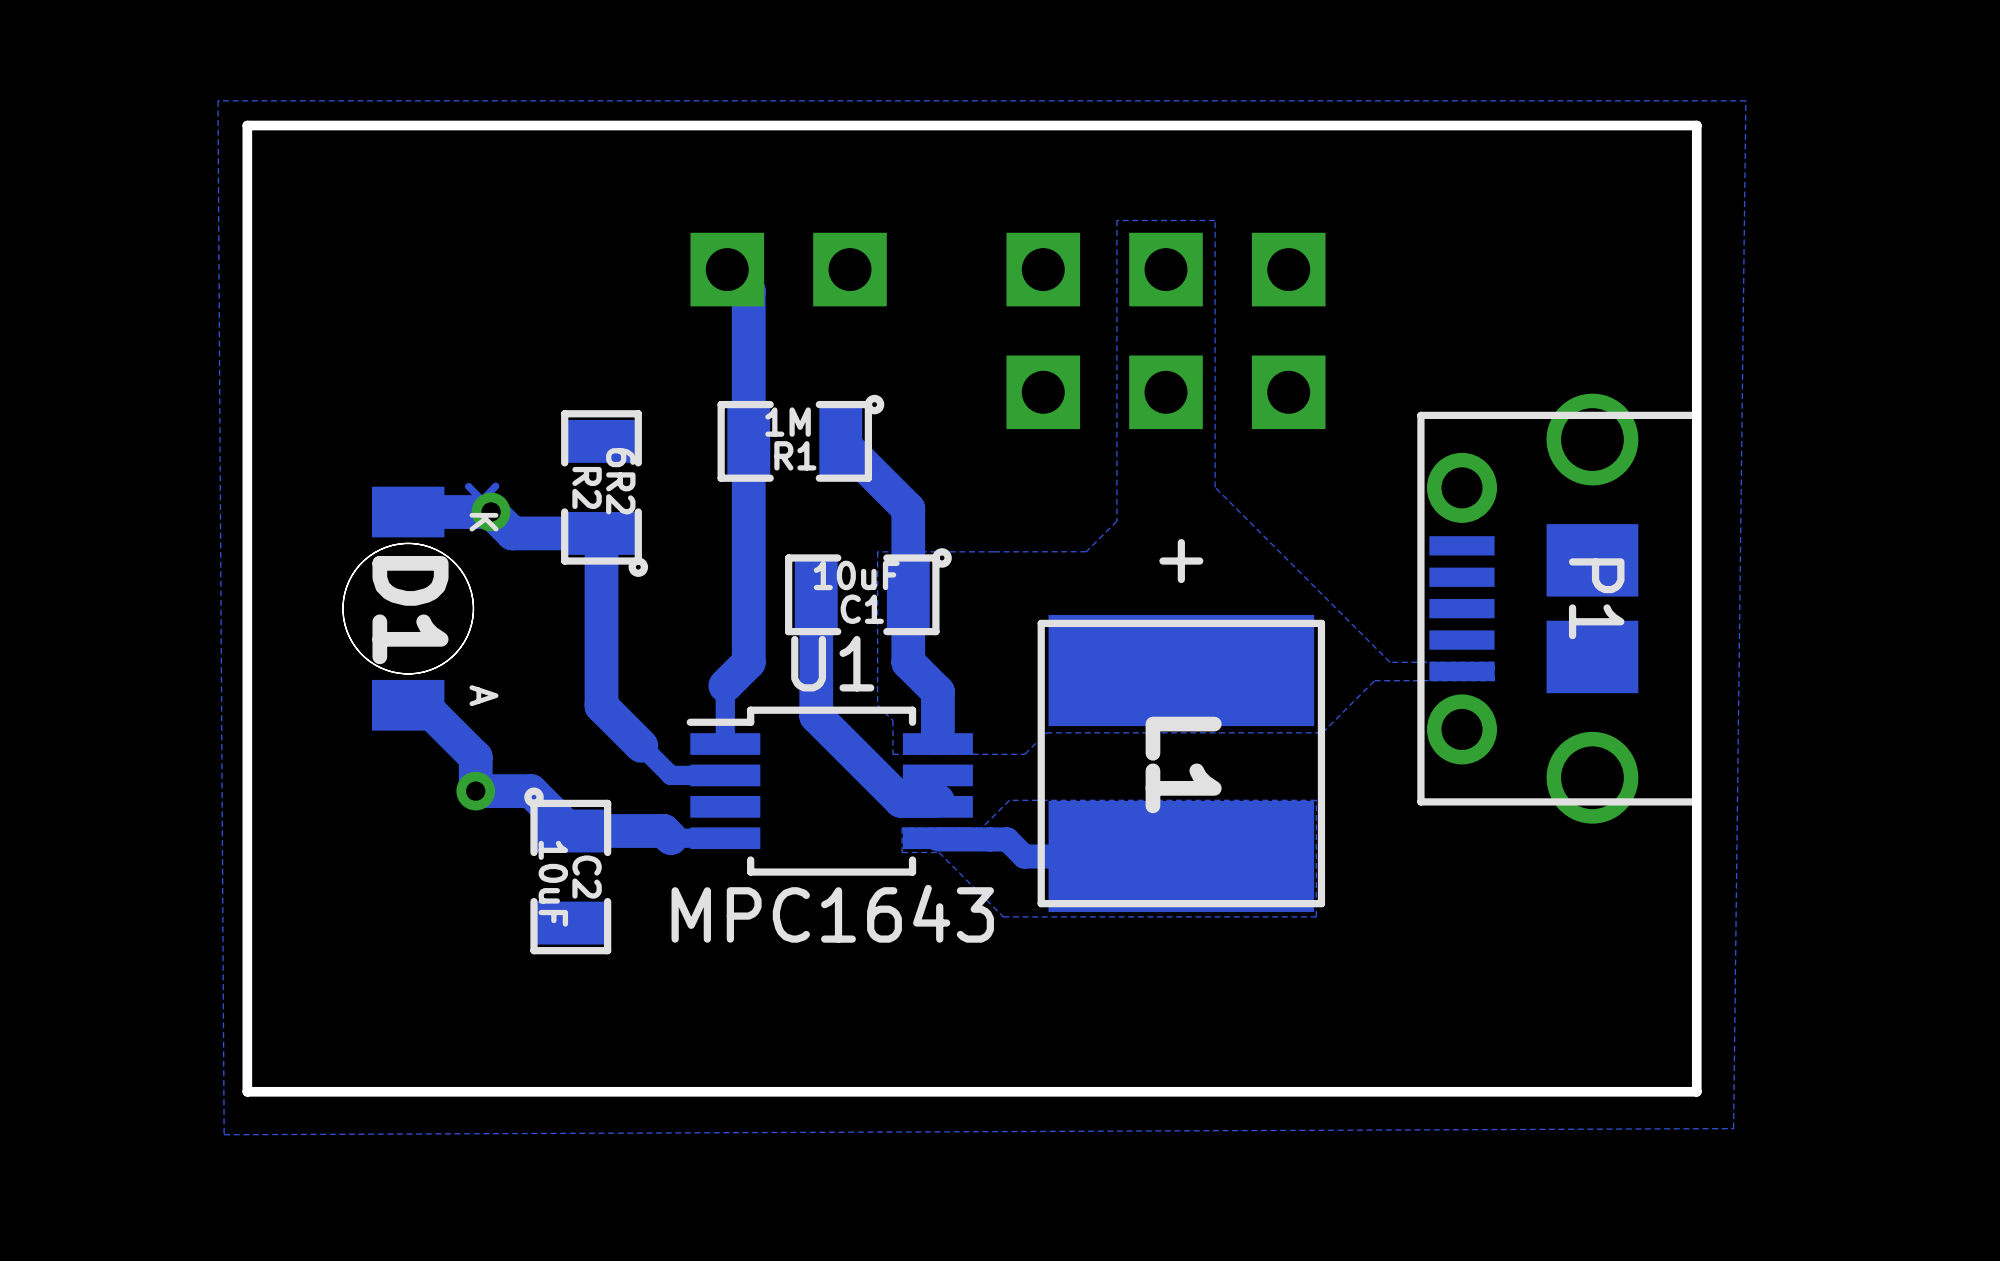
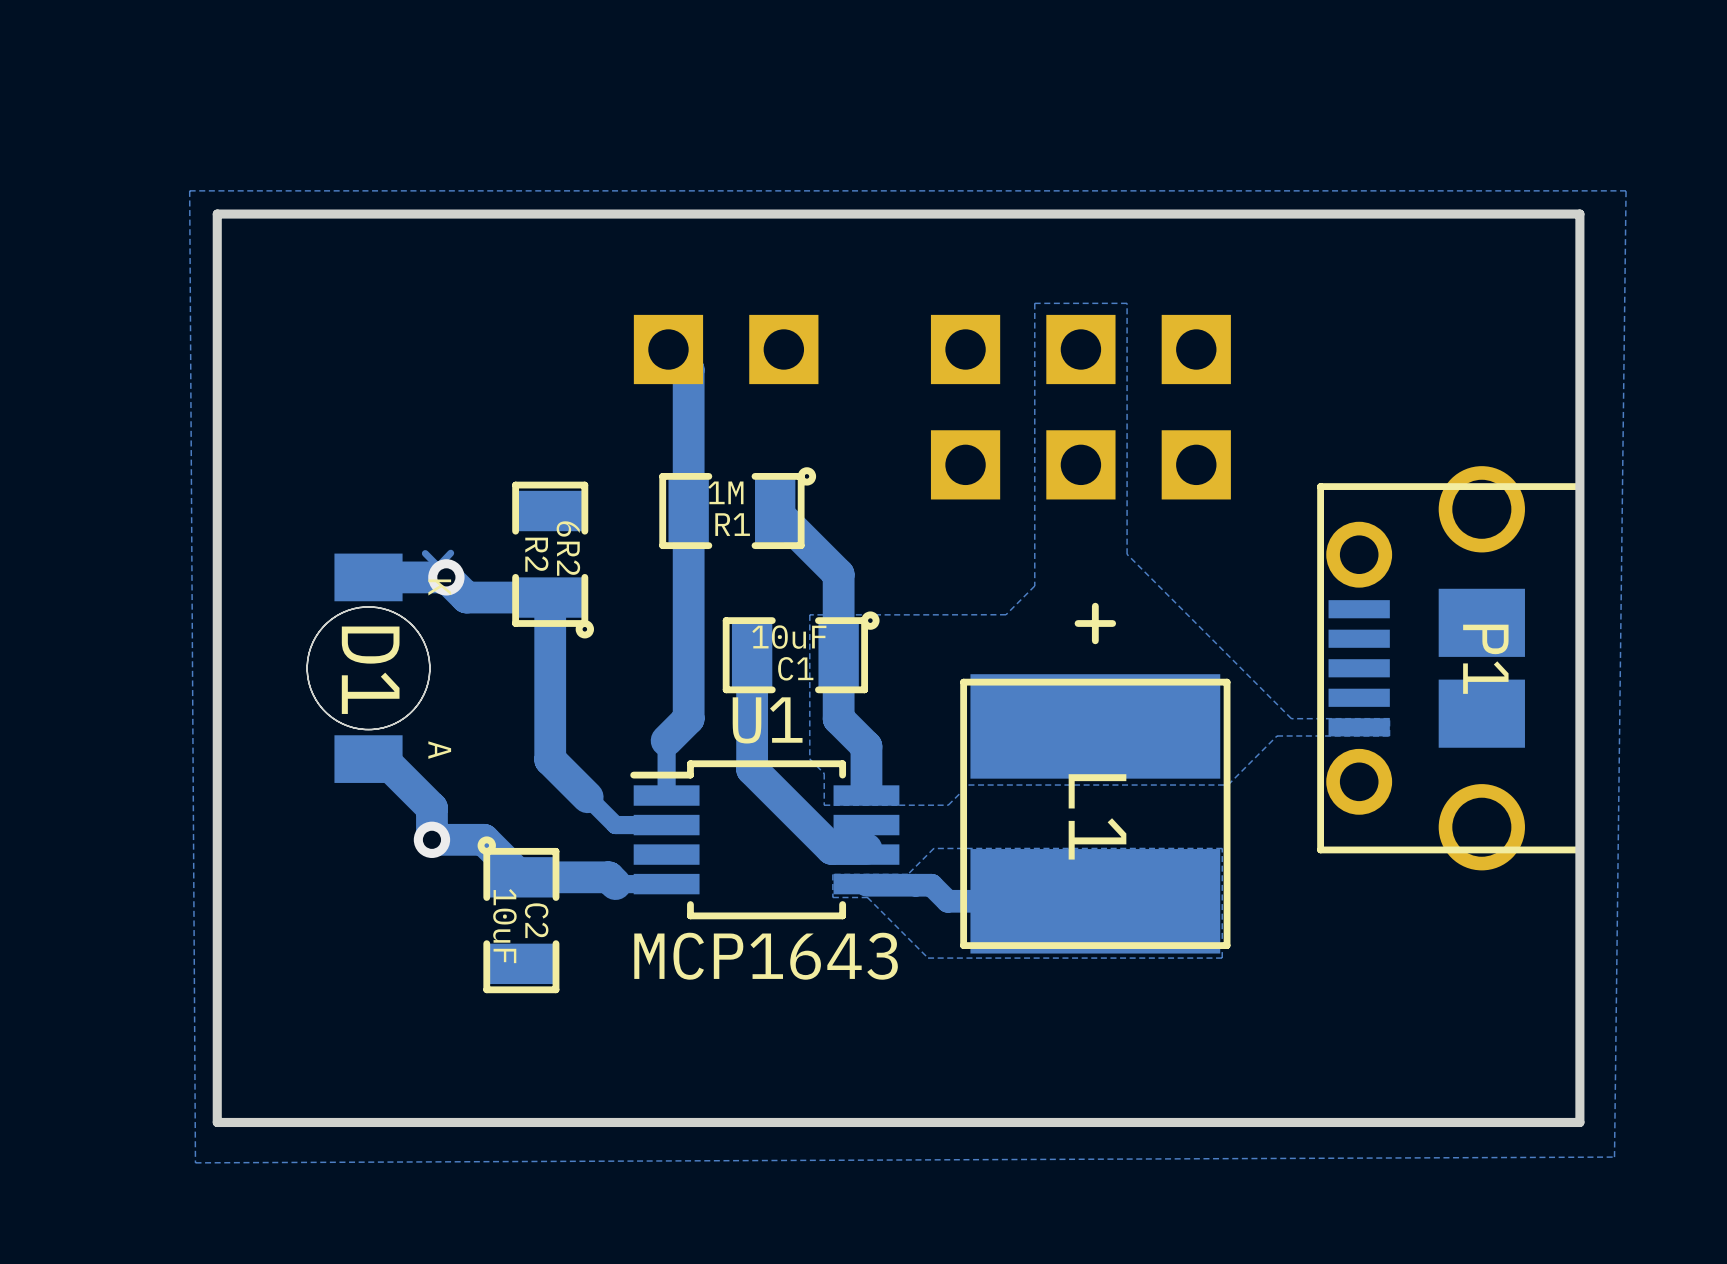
U1 value: MPC1643 (832, 913) -> MCP1643 (766, 956)

